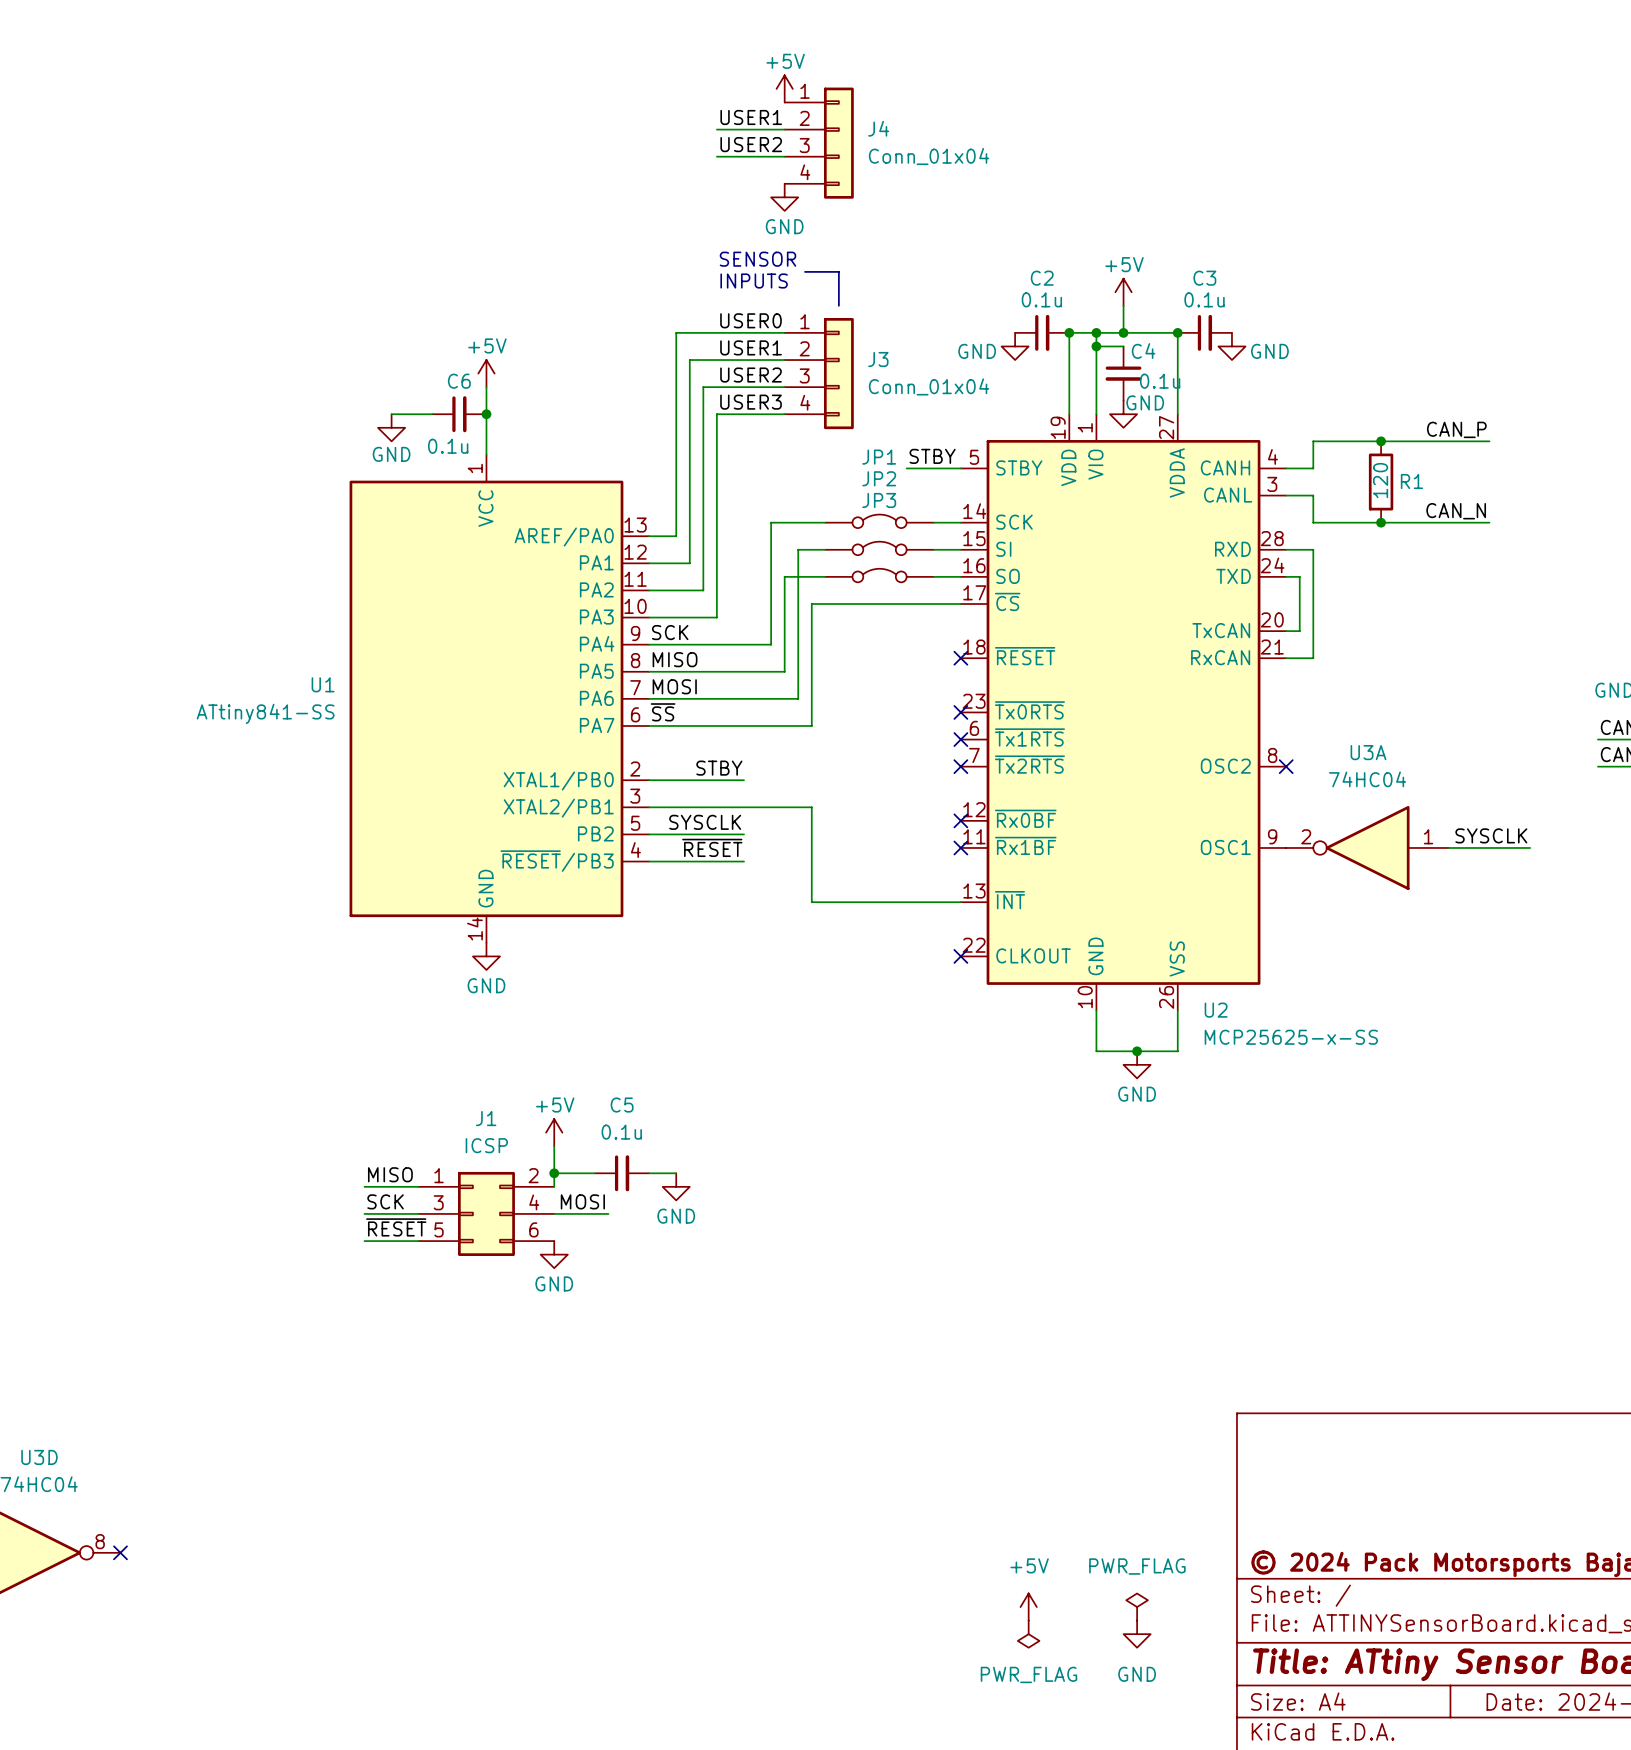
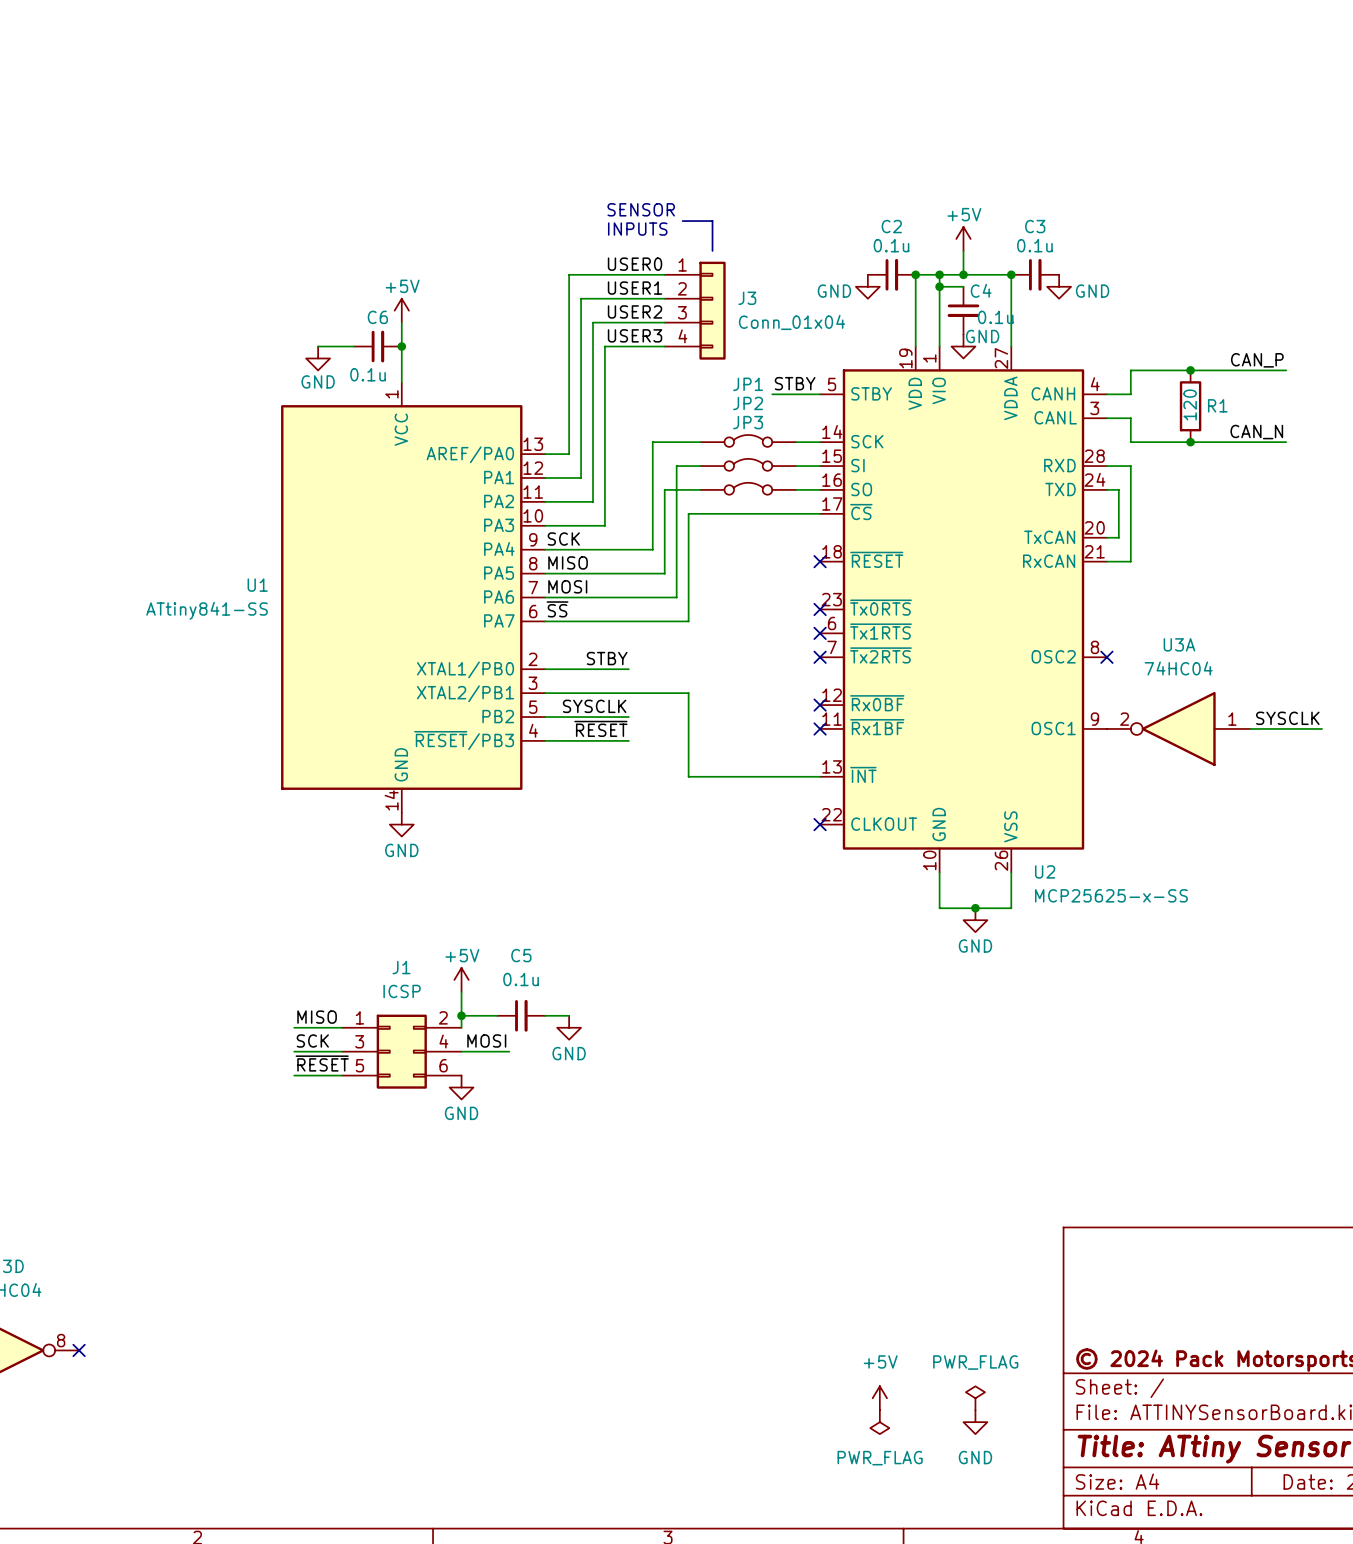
power symbol: +5V (784, 88) -> none
label: USER1 (751, 117) -> none
wire: (716, 129) (784, 129) -> none
J4: Conn_01x04 (819, 143) -> none
label: USER2 (751, 144) -> none
wire: (716, 156) (784, 156) -> none
power symbol: GND (784, 197) -> none

